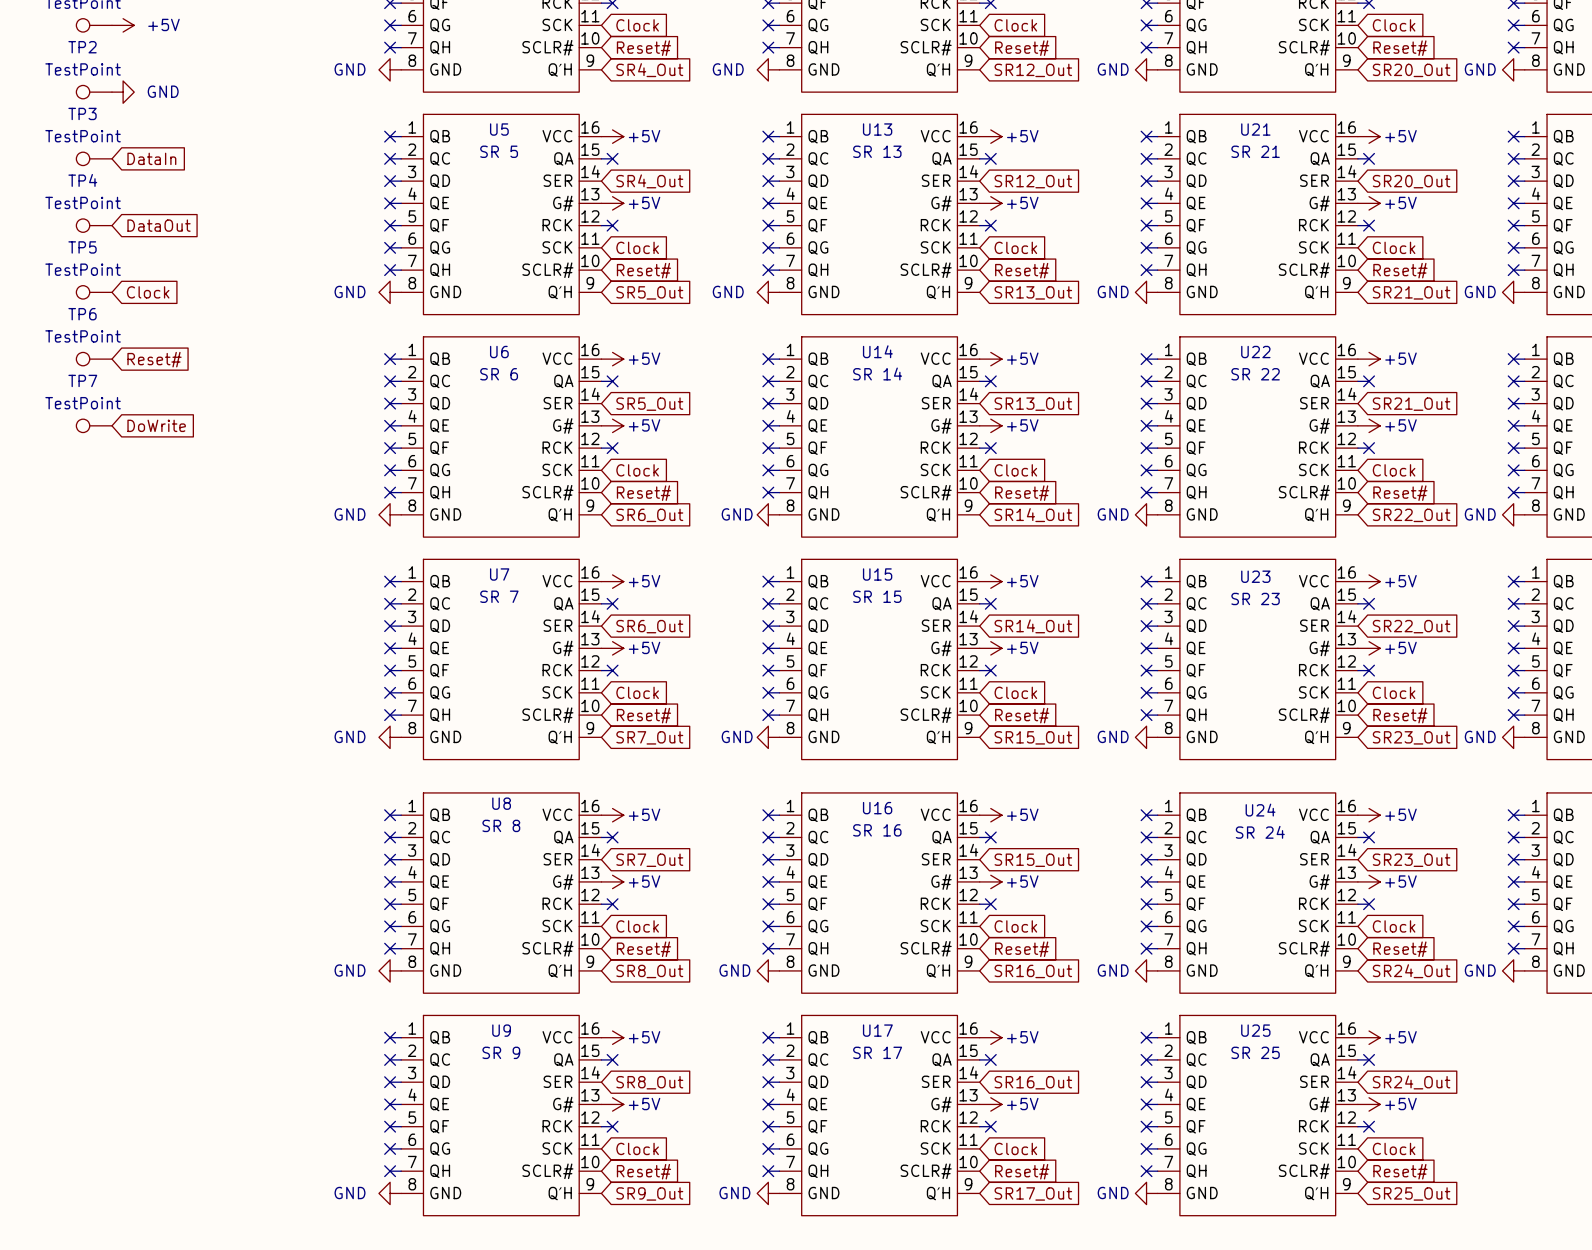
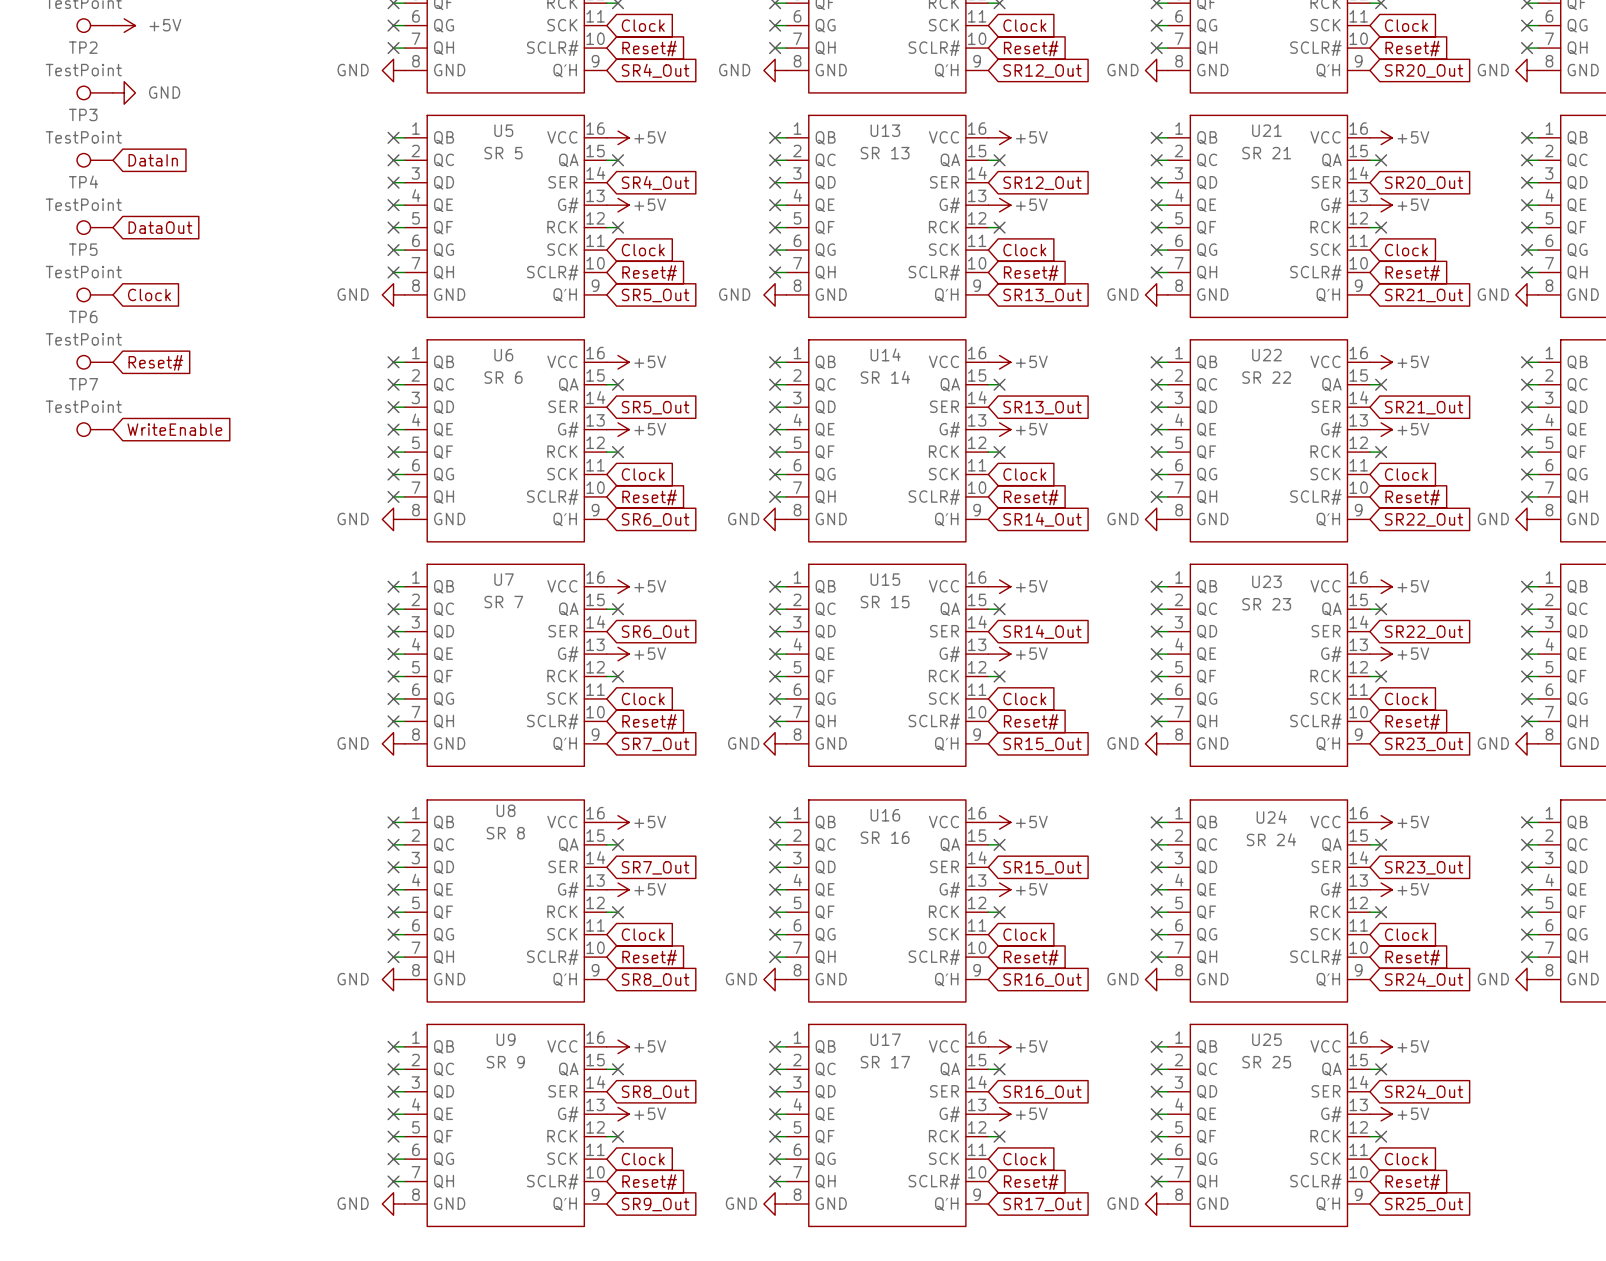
global label: DoWrite (156, 425) -> WriteEnable (174, 429)

